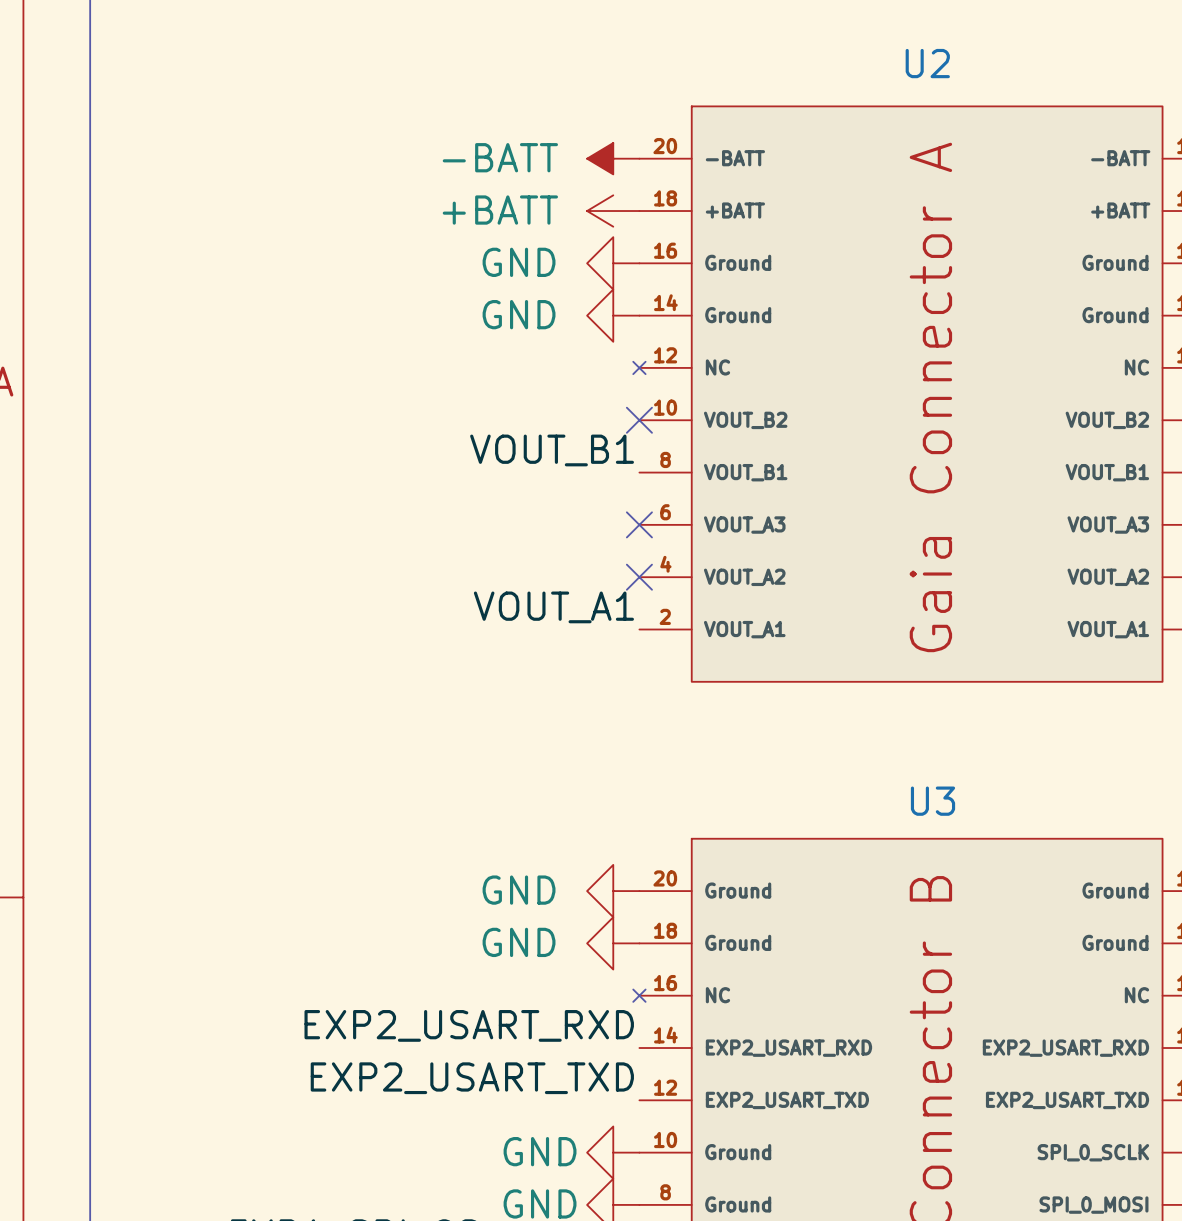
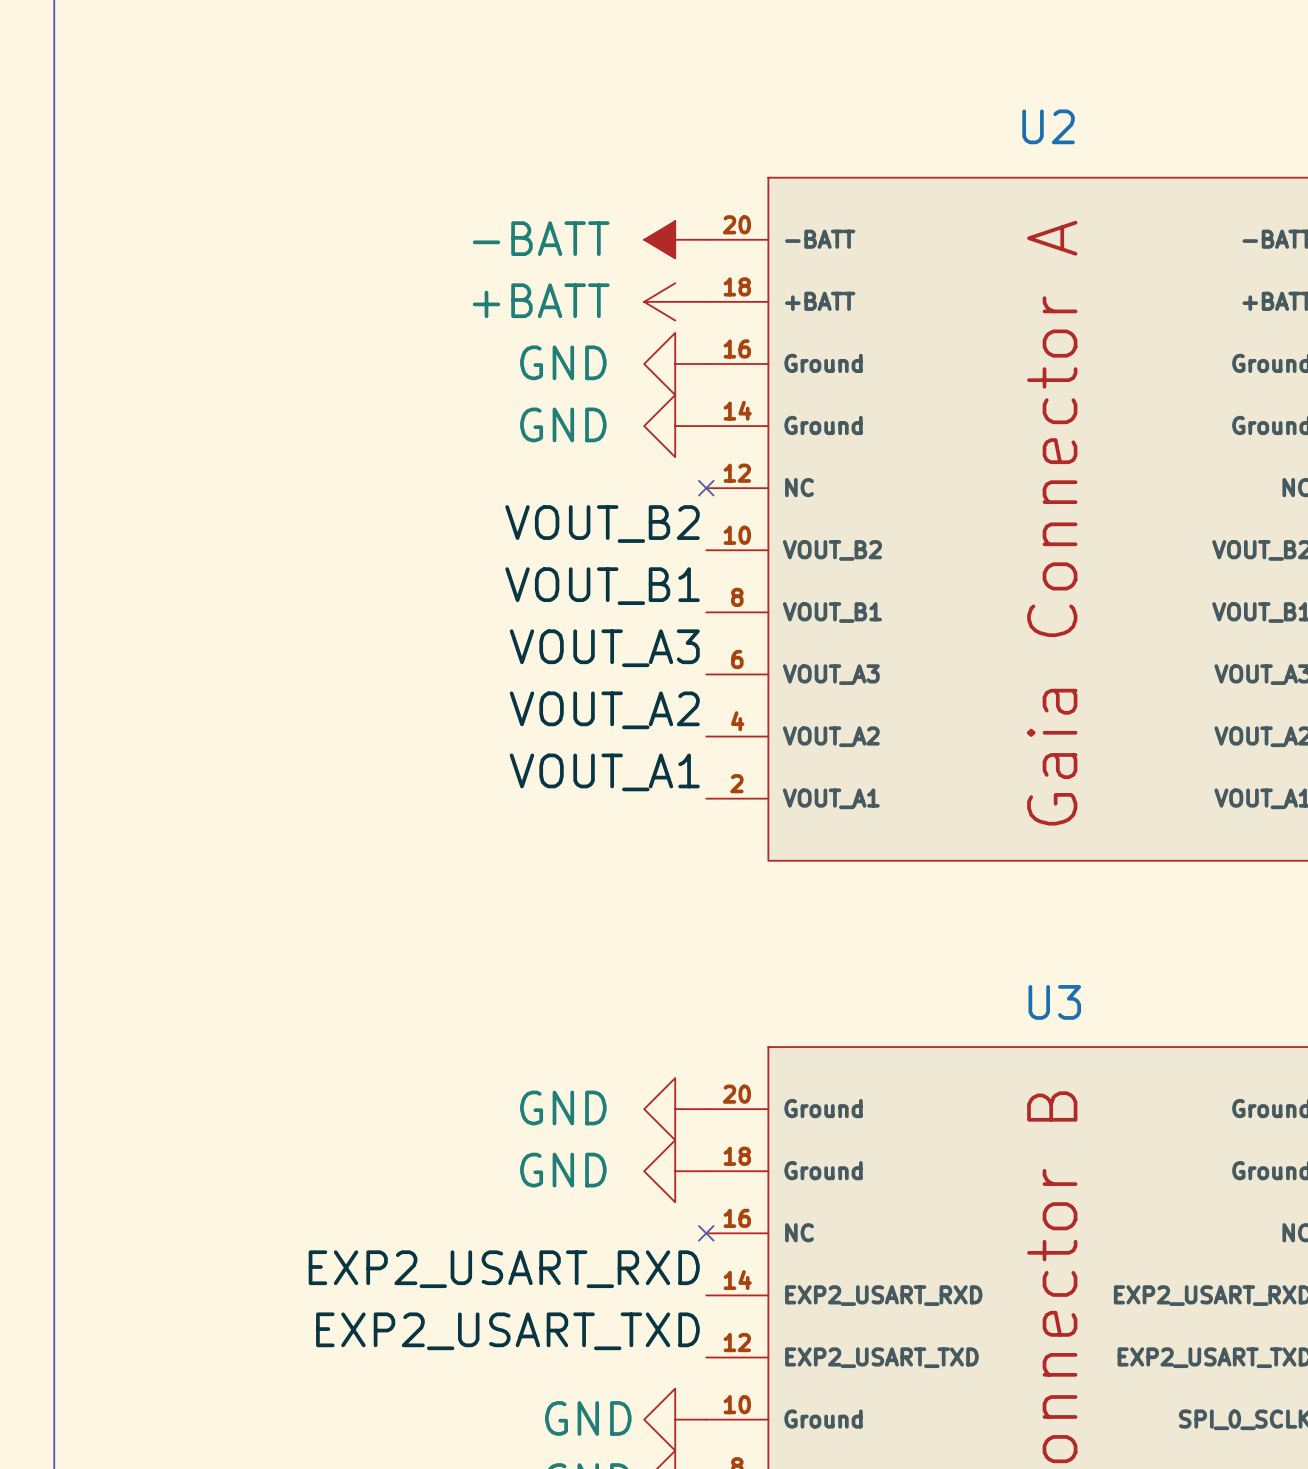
label: none -> VOUT_B2 (602, 524)
no-connect mark: (639, 420) -> none
label: none -> VOUT_A3 (604, 648)
no-connect mark: (639, 524) -> none
label: none -> VOUT_A2 (604, 710)
no-connect mark: (639, 577) -> none

